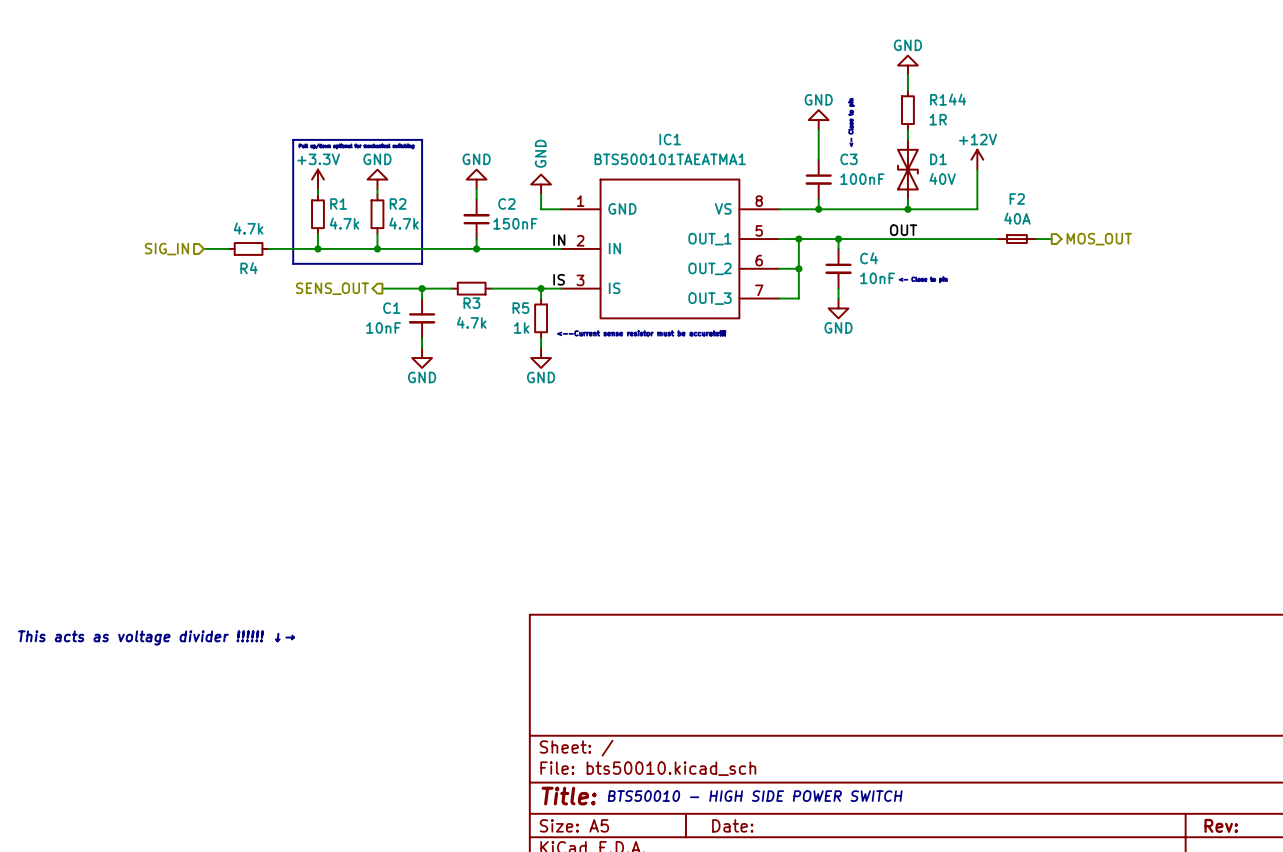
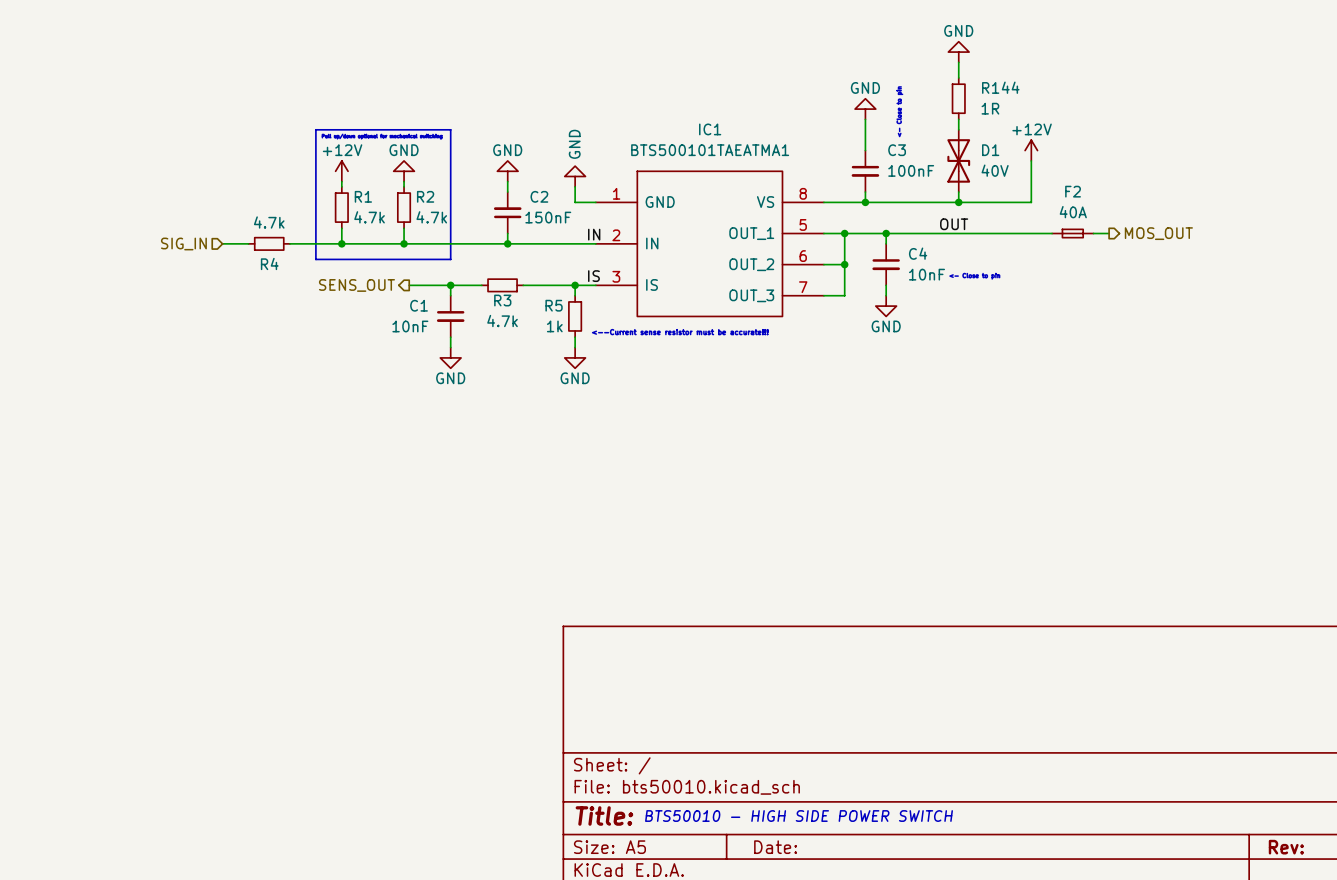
power symbol: +3.3V (317, 179) -> +12V (341, 171)
text: This acts as voltage divider !!!!!! ↓→ (156, 638) -> none

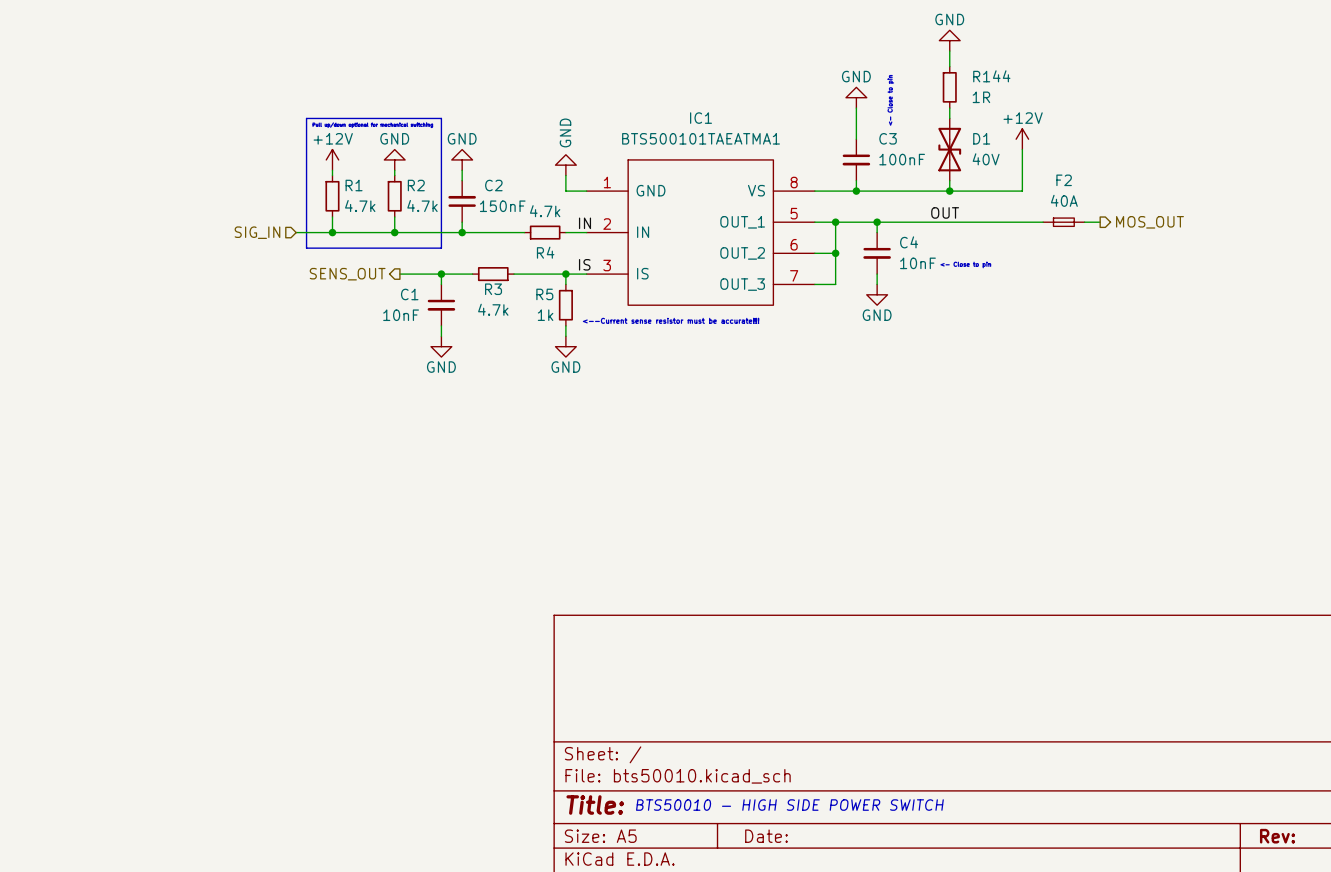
power symbol position: GND (507, 171) -> GND (462, 159)
wire: (507, 181) (507, 192) -> (462, 170) (462, 180)
C2 position: (507, 212) -> (462, 201)
wire: (507, 233) (507, 243) -> (462, 222) (462, 232)
hierarchical label position: SIG_IN (183, 243) -> SIG_IN (257, 232)
wire: (222, 243) (248, 243) -> none
R4 position: (269, 243) -> (545, 232)
wire: (289, 243) (305, 243) -> none
junction position: (507, 243) -> (462, 232)
wire: (533, 243) (575, 243) -> none

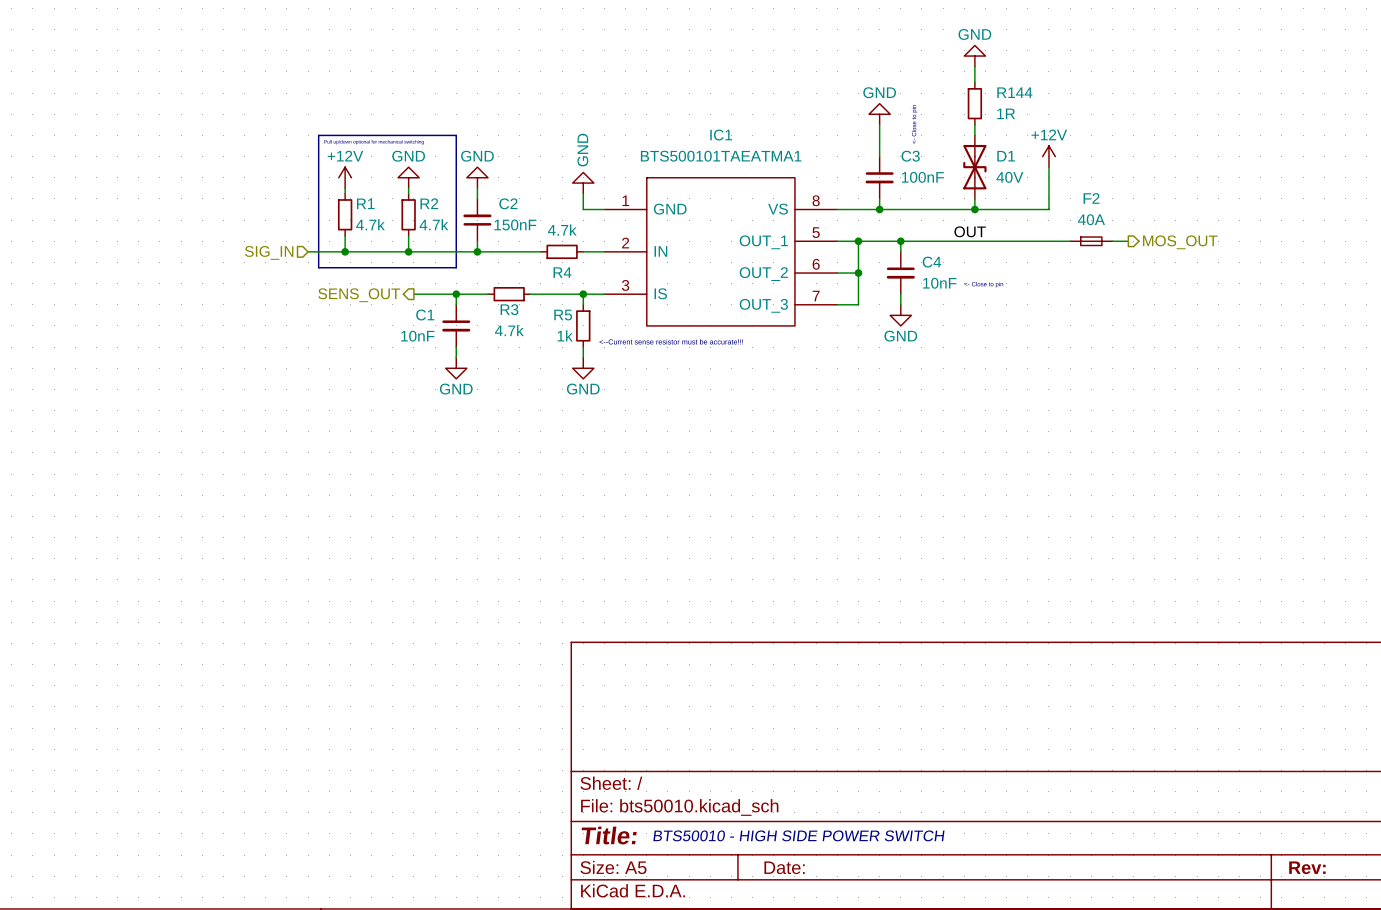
label: IN (585, 223) -> none
label: IS (584, 264) -> none

